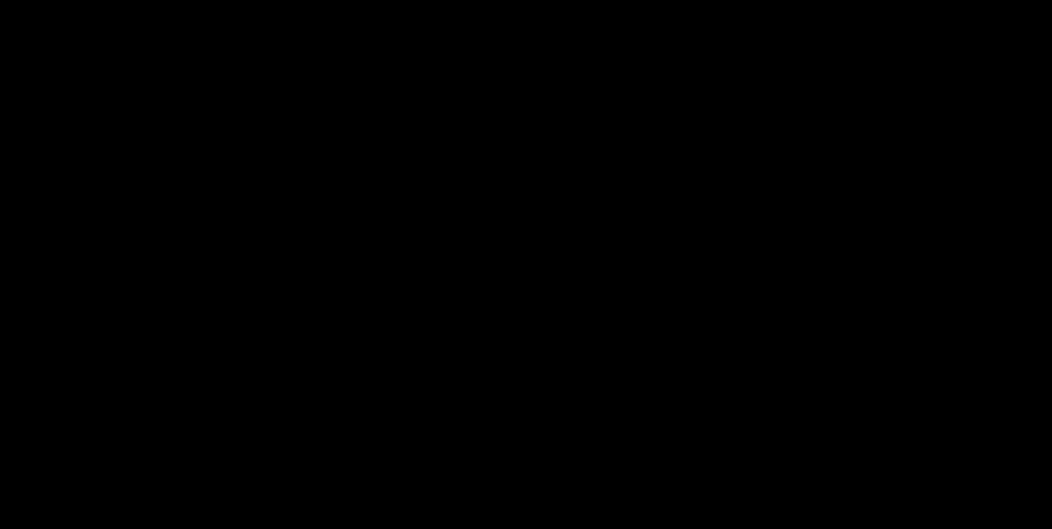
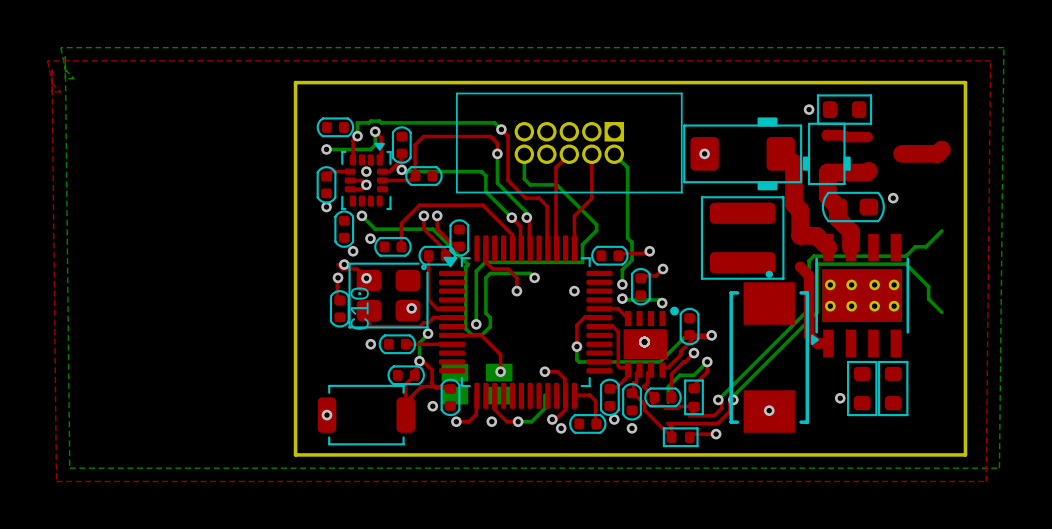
bottom zone outline: none -> (60, 47) (1003, 47) (999, 468) (69, 468) (65, 56) (65, 78) (74, 78) (65, 69) (60, 47)
top zone outline: none -> (47, 60) (990, 60) (986, 481) (56, 481) (52, 69) (52, 91) (60, 91) (52, 83) (47, 60)
board edge: none -> (295, 82) (965, 82) (965, 454) (295, 454) (295, 82)
via: none -> (809, 109)
part: none -> (844, 109)
part: none -> (335, 127)
top track: none -> (501, 129) (508, 136) (508, 180) (525, 198) (539, 198) (547, 206) (547, 246)
bottom track: none -> (501, 129) (494, 122) (381, 122) (370, 121) (369, 122) (357, 122) (357, 136) (358, 134)
via: none -> (501, 129)
top track: none -> (375, 131) (381, 137) (381, 159)
bottom track: none -> (375, 131) (375, 145) (370, 149) (326, 149)
via: none -> (375, 131)
top track: none -> (826, 135) (867, 137)
top track: none -> (357, 136) (353, 140) (353, 159)
via: none -> (357, 136)
part: none -> (569, 142)
part: none -> (401, 145)
via: none -> (326, 149)
top track: none -> (941, 149) (937, 153) (902, 153)
top track: none -> (497, 153) (497, 143) (490, 136) (423, 136) (415, 145) (415, 176) (410, 180) (384, 180)
bottom track: none -> (497, 153) (497, 183) (526, 212) (526, 217)
via: none -> (497, 153)
via: none -> (704, 153)
part: none -> (742, 153)
part: none -> (826, 153)
bottom track: none -> (524, 154) (524, 179) (530, 184) (556, 184) (596, 224) (596, 230) (582, 244) (582, 262) (485, 262) (476, 271) (476, 324)
top track: none -> (569, 154) (555, 167) (555, 246)
top track: none -> (591, 154) (591, 198) (574, 215) (574, 248)
bottom track: none -> (614, 154) (627, 167) (627, 237) (632, 242) (632, 260) (622, 269) (622, 284)
top track: none -> (401, 159) (389, 171) (384, 171)
top track: none -> (794, 162) (794, 204) (800, 210) (800, 235) (816, 235) (828, 247)
bottom track: none -> (401, 169) (403, 171) (481, 171) (485, 176) (485, 191) (511, 217)
via: none -> (401, 169)
top track: none -> (868, 170) (867, 172) (827, 172) (827, 197) (837, 207) (837, 218) (850, 231) (850, 247)
top track: none -> (350, 171) (331, 171) (326, 176) (326, 172)
via: none -> (366, 171)
part: none -> (366, 176)
part: none -> (423, 176)
top track: none -> (351, 180) (361, 180) (366, 184) (361, 189) (351, 189)
part: none -> (326, 184)
via: none -> (366, 184)
via: none -> (893, 198)
via: none -> (326, 207)
part: none -> (853, 207)
bottom track: none -> (361, 215) (375, 229) (432, 229) (468, 264) (465, 267) (465, 328) (471, 334) (481, 334) (490, 326) (490, 317) (485, 313) (485, 277) (490, 273) (530, 273) (534, 277)
via: none -> (361, 215)
top track: none -> (423, 215) (423, 229) (444, 250) (444, 253)
via: none -> (423, 215)
top track: none -> (437, 215) (437, 229) (452, 244) (458, 244)
via: none -> (437, 215)
top track: none -> (511, 217) (520, 226) (520, 246)
via: none -> (511, 217)
top track: none -> (526, 217) (529, 220) (529, 246)
via: none -> (526, 217)
part: none -> (344, 229)
bottom track: none -> (941, 230) (925, 246) (915, 246) (906, 256) (813, 256) (809, 260) (809, 309) (718, 399)
part: none -> (459, 237)
part: none -> (742, 237)
via: none -> (370, 238)
part: none -> (392, 246)
top track: none -> (401, 246) (401, 223) (419, 205) (482, 205) (512, 234) (512, 248)
top track: none -> (485, 246) (485, 261) (492, 268) (508, 268) (516, 277) (516, 291)
via: none -> (353, 251)
top track: none -> (649, 251) (647, 253) (617, 253)
via: none -> (649, 251)
top track: none -> (428, 255) (428, 300) (437, 308) (452, 308)
part: none -> (437, 255)
part: none -> (609, 255)
top track: none -> (338, 264) (342, 268) (357, 268) (366, 278)
via: none -> (344, 264)
top track: none -> (800, 266) (809, 275) (809, 335) (817, 343) (828, 343)
top track: none -> (663, 268) (656, 275) (642, 275)
via: none -> (663, 268)
top track: none -> (338, 277) (337, 298)
via: none -> (338, 277)
via: none -> (534, 277)
via: none -> (366, 278)
via: none -> (622, 284)
part: none -> (640, 286)
via: none -> (516, 291)
via: none -> (574, 291)
part: none -> (388, 295)
part: none -> (860, 295)
bottom track: none -> (622, 298) (659, 299) (662, 303)
via: none -> (622, 298)
via: none -> (662, 303)
C10: none -> (339, 308)
via: none -> (411, 308)
top track: none -> (599, 308) (618, 308) (628, 318)
top track: none -> (369, 310) (369, 324) (370, 326) (420, 326) (433, 317) (452, 317)
bottom track: none -> (941, 312) (928, 299) (928, 286) (906, 264) (817, 264) (817, 312) (733, 396) (733, 399)
top track: none -> (598, 317) (585, 317) (576, 325) (576, 346)
part: none -> (525, 322)
via: none -> (476, 324)
top track: none -> (598, 325) (612, 325) (618, 331) (618, 365) (626, 367)
part: none -> (689, 326)
bottom track: none -> (428, 333) (419, 342) (419, 361)
via: none -> (428, 333)
top track: none -> (452, 335) (481, 335) (500, 354) (500, 371)
bottom track: none -> (711, 335) (686, 335) (660, 361) (578, 361) (576, 359) (576, 346)
via: none -> (711, 335)
top track: none -> (688, 337) (709, 337) (711, 335) (696, 335) (680, 351) (680, 354) (667, 367) (661, 367)
via: none -> (644, 342)
part: none -> (651, 342)
via: none -> (370, 344)
part: none -> (397, 344)
top track: none -> (405, 344) (452, 344)
via: none -> (576, 346)
part: none -> (769, 351)
top track: none -> (693, 353) (671, 374) (671, 397)
via: none -> (693, 353)
via: none -> (419, 361)
top track: none -> (707, 361) (707, 372) (693, 386)
bottom track: none -> (707, 361) (693, 375) (679, 375) (668, 386) (668, 402)
via: none -> (707, 361)
top track: none -> (627, 367) (627, 377) (617, 386) (609, 386)
top track: none -> (651, 369) (647, 373) (647, 382) (643, 386) (654, 397) (651, 400) (652, 406) (663, 406) (665, 408) (693, 406)
top track: none -> (639, 370) (636, 373) (636, 382) (633, 382) (633, 393) (644, 404) (644, 410) (671, 437) (671, 427) (668, 423) (717, 423) (729, 411) (729, 403) (733, 399)
via: none -> (500, 371)
top track: none -> (544, 371) (557, 371) (564, 378) (564, 393)
via: none -> (544, 371)
part: none -> (406, 375)
part: none -> (454, 384)
part: none -> (499, 384)
top track: none -> (449, 386) (421, 386) (405, 402)
top track: none -> (445, 387) (436, 387) (432, 383) (432, 370) (423, 361) (419, 361) (419, 365) (414, 370) (414, 375) (405, 384) (405, 415)
part: none -> (862, 388)
part: none -> (893, 388)
top track: none -> (476, 393) (476, 414) (468, 421) (456, 421)
top track: none -> (493, 395) (493, 408) (506, 421) (518, 421)
bottom track: none -> (544, 395) (544, 408) (531, 421) (518, 421)
top track: none -> (565, 395) (565, 409) (555, 419) (552, 419)
top track: none -> (575, 395) (589, 395) (595, 400) (595, 423)
part: none -> (450, 397)
part: none -> (609, 397)
part: none -> (663, 397)
part: none -> (693, 397)
via: none -> (840, 398)
top track: none -> (718, 399) (721, 403) (721, 408) (714, 415) (689, 415) (693, 411) (693, 404)
via: none -> (718, 399)
via: none -> (733, 399)
part: none -> (632, 401)
via: none -> (432, 406)
via: none -> (769, 410)
via: none -> (326, 415)
part: none -> (366, 415)
via: none -> (552, 419)
via: none -> (614, 419)
via: none -> (456, 421)
via: none -> (491, 421)
via: none -> (518, 421)
part: none -> (587, 423)
via: none -> (561, 428)
via: none -> (632, 428)
top track: none -> (716, 434) (692, 434) (689, 437)
via: none -> (716, 434)
part: none -> (680, 437)

